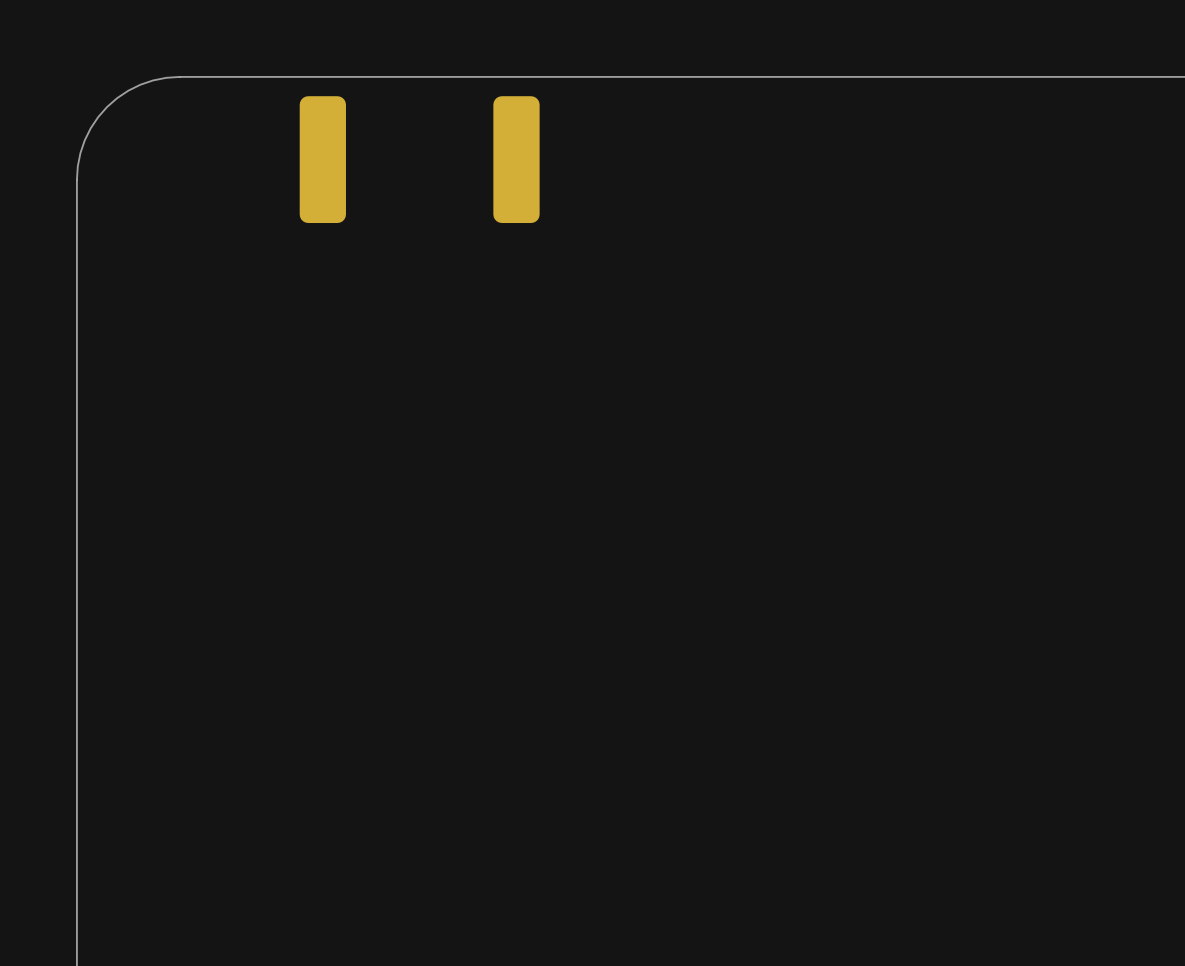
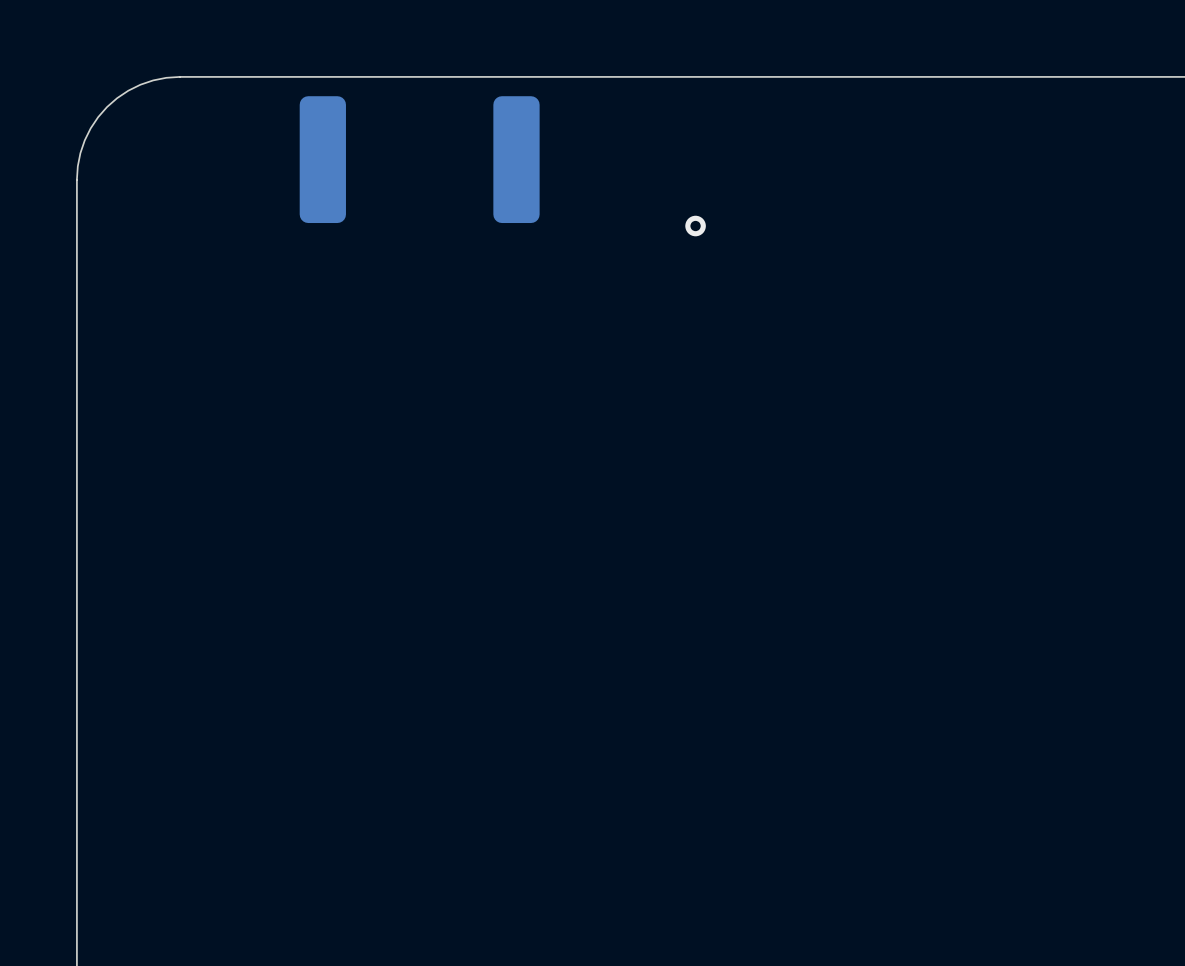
via: none -> (695, 226)

